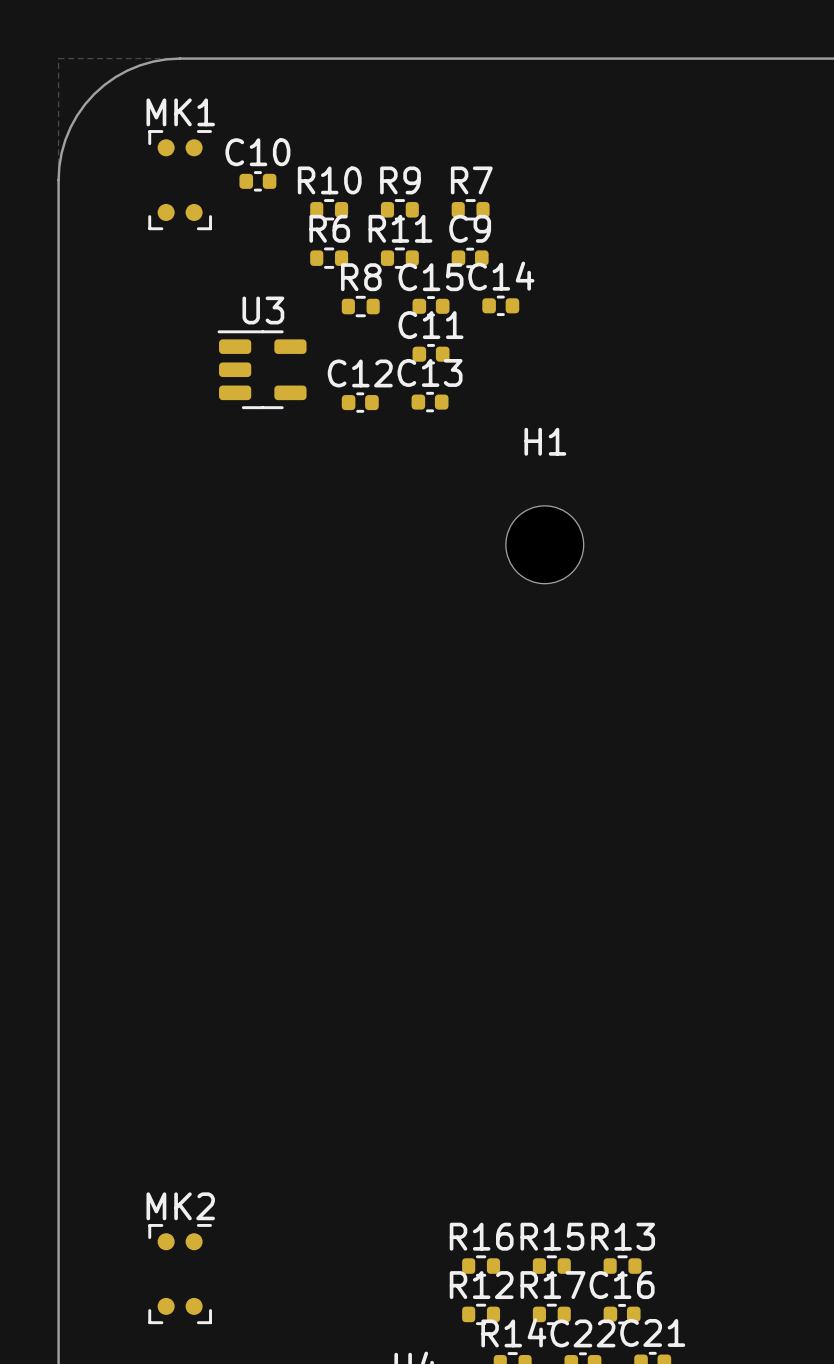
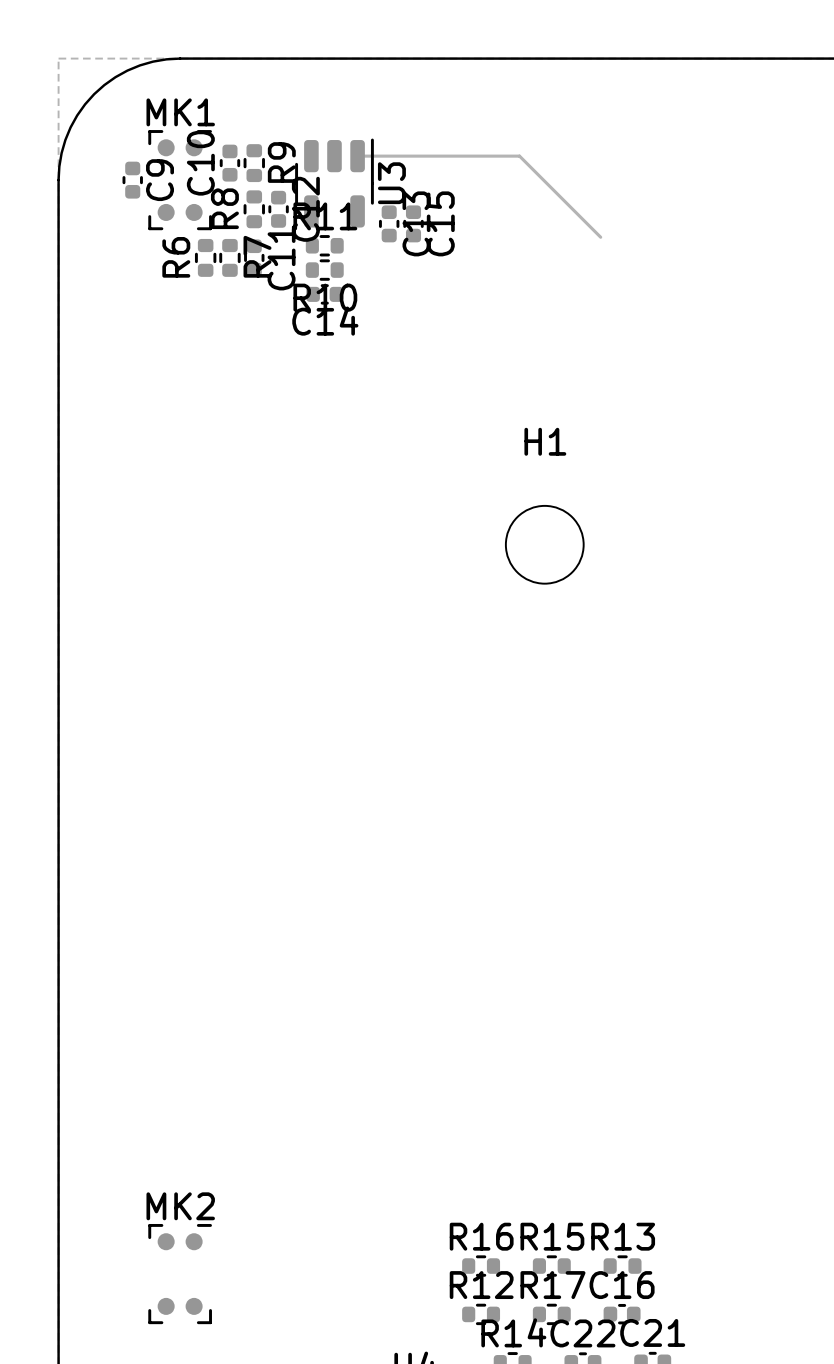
track: none -> (357, 156) (519, 156) (600, 237)
R10 name position: R10 (329, 180) -> R10 (325, 297)
C10 rotation: 0° (257, 181) -> 90° clockwise (229, 163)
C10 position: (257, 181) -> (229, 163)
R10 position: (329, 209) -> (324, 270)
R9 rotation: 0° (399, 209) -> 90° clockwise (254, 163)
R9 position: (399, 209) -> (254, 163)
R7 rotation: 0° (470, 209) -> 90° clockwise (229, 257)
R7 position: (470, 209) -> (229, 257)
C9 rotation: 0° (470, 257) -> 90° clockwise (132, 180)
C9 position: (470, 257) -> (132, 180)
R6 rotation: 0° (329, 258) -> 90° clockwise (205, 257)
R6 position: (329, 258) -> (205, 257)
R11 position: (399, 258) -> (324, 245)
C14 name position: C14 (501, 276) -> C14 (325, 321)
C14 position: (500, 305) -> (324, 294)
R8 rotation: 0° (360, 306) -> 90° clockwise (254, 209)
R8 position: (360, 306) -> (254, 209)
C15 rotation: 0° (431, 306) -> 90° clockwise (413, 223)
C15 position: (431, 306) -> (413, 223)
C11 rotation: 0° (431, 354) -> 90° clockwise (254, 257)
C11 position: (431, 354) -> (254, 257)
U3 rotation: 0° (262, 369) -> 90° clockwise (334, 183)
U3 position: (262, 369) -> (334, 183)
C12 rotation: 0° (360, 402) -> 90° clockwise (278, 209)
C12 position: (360, 402) -> (278, 209)
C13 rotation: 0° (430, 402) -> 90° clockwise (389, 223)
C13 position: (430, 402) -> (389, 223)

